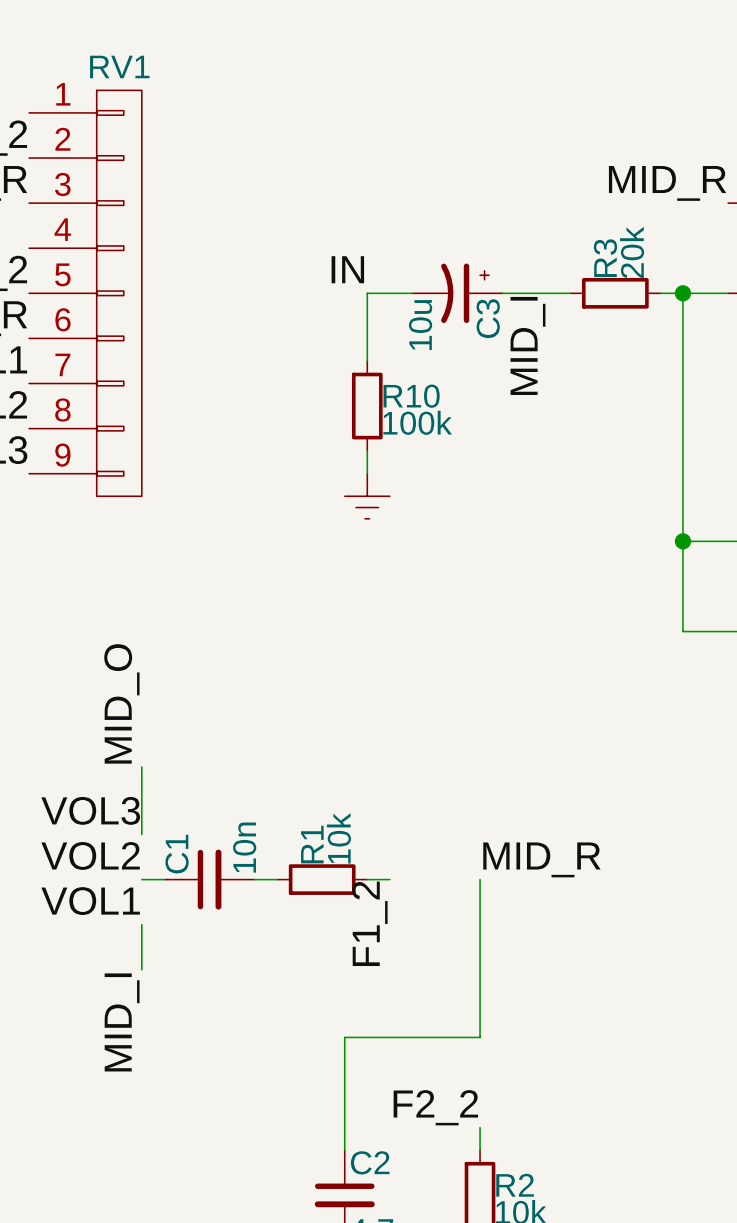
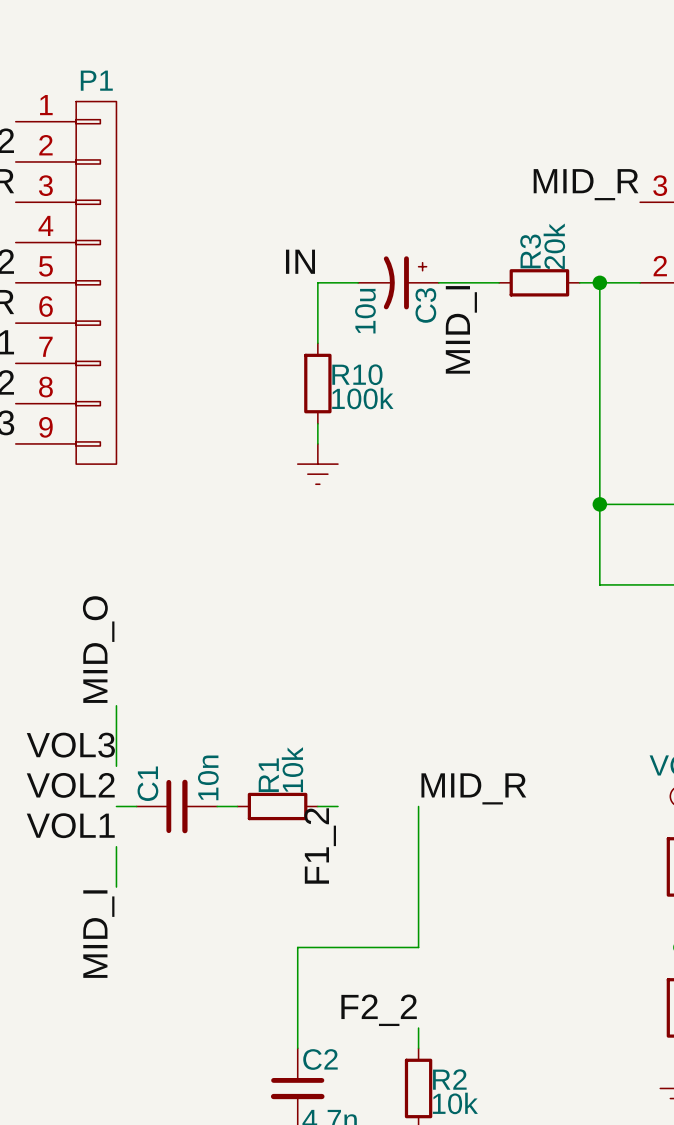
RV1 name: RV1 (119, 66) -> P1 (96, 80)

